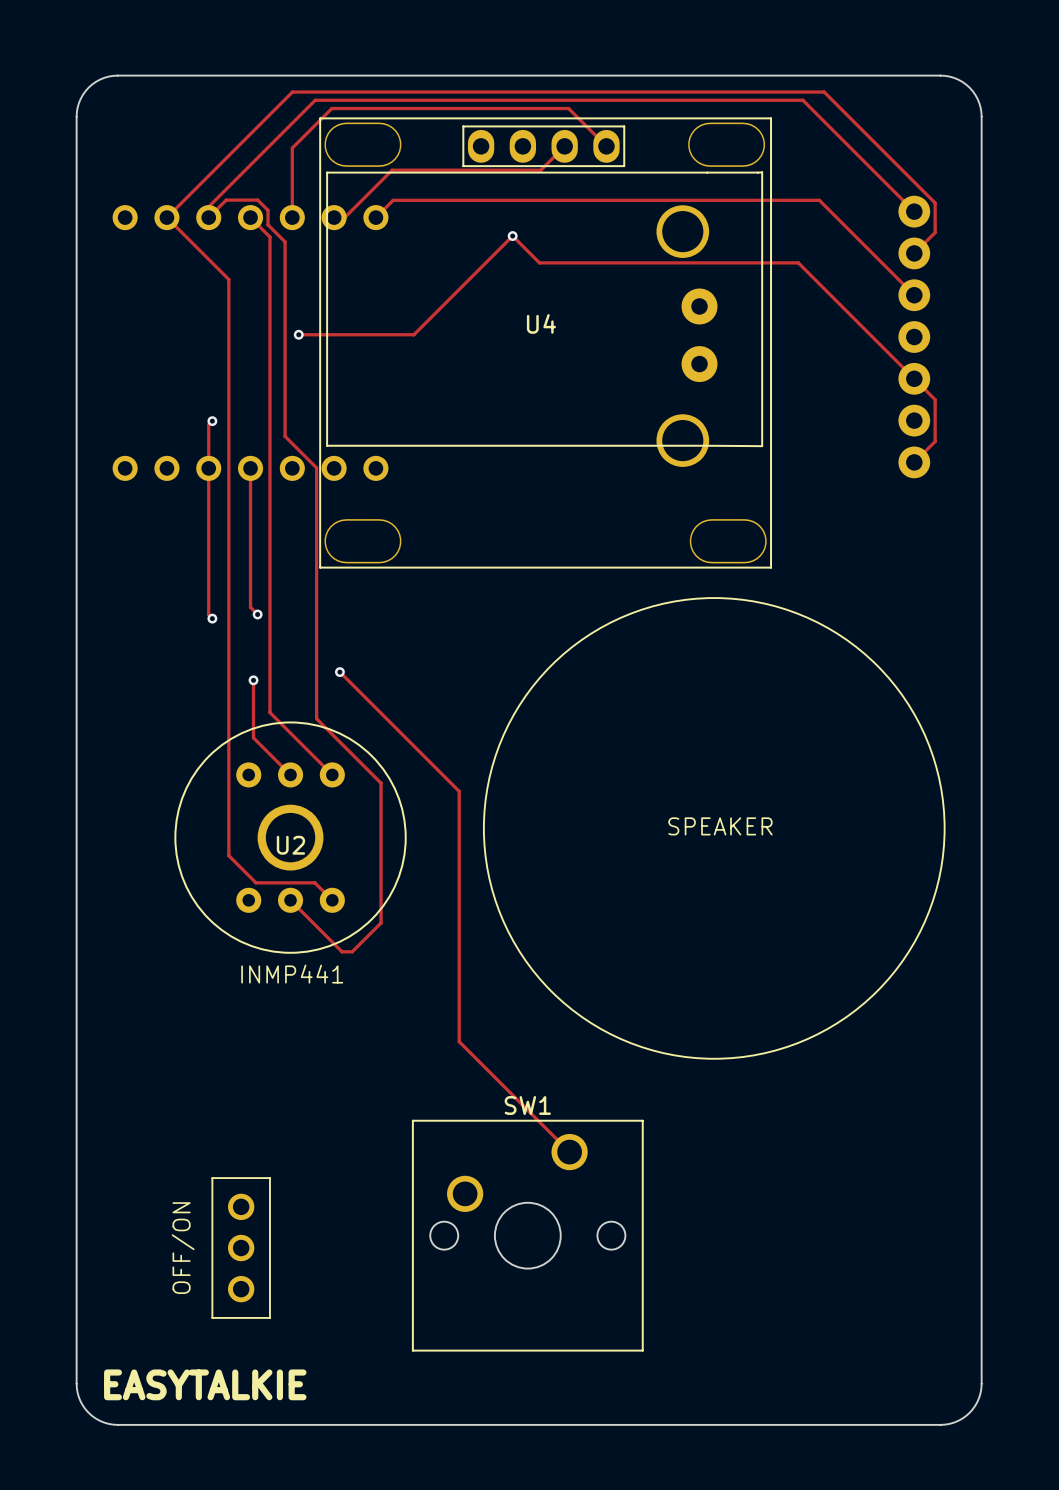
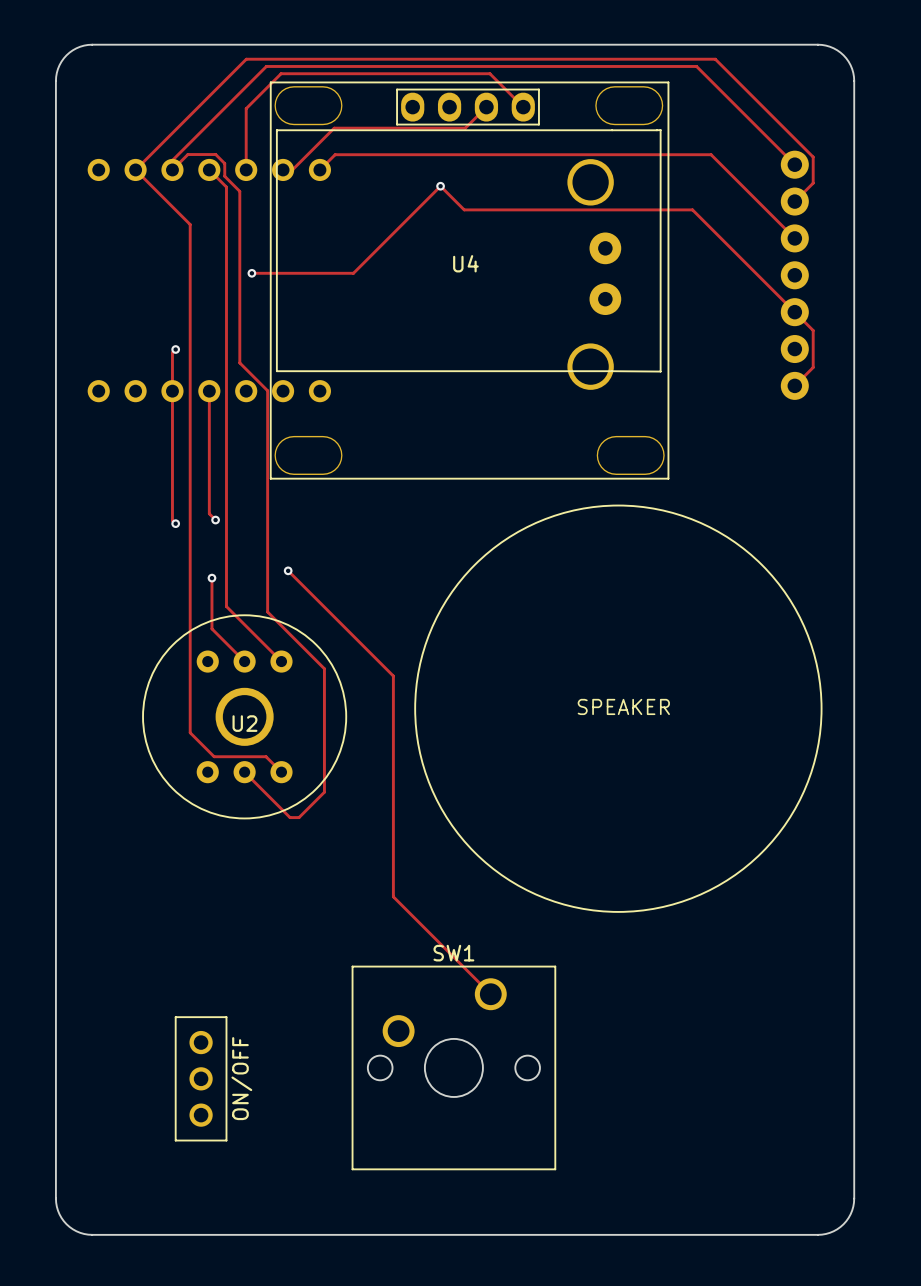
text: INMP441 (292, 974) -> none
part value: none -> ON/OFF (241, 1078)
text: OFF/ON (183, 1248) -> none
text: EASYTALKIE (205, 1384) -> none

